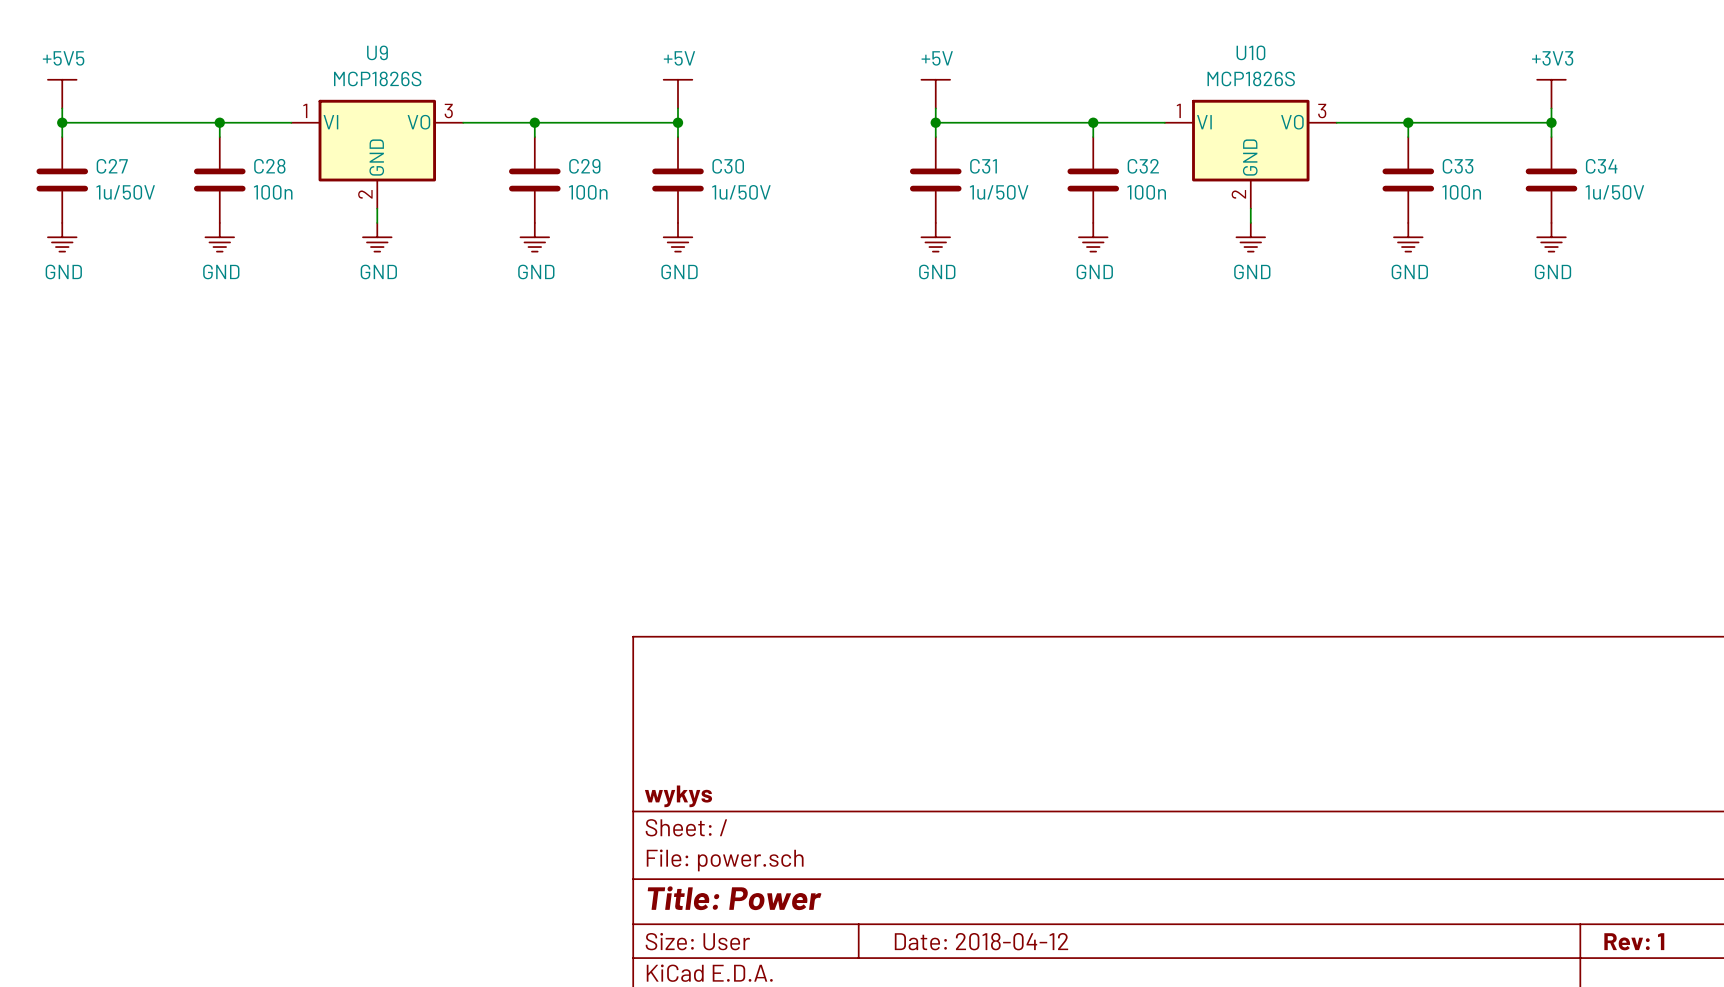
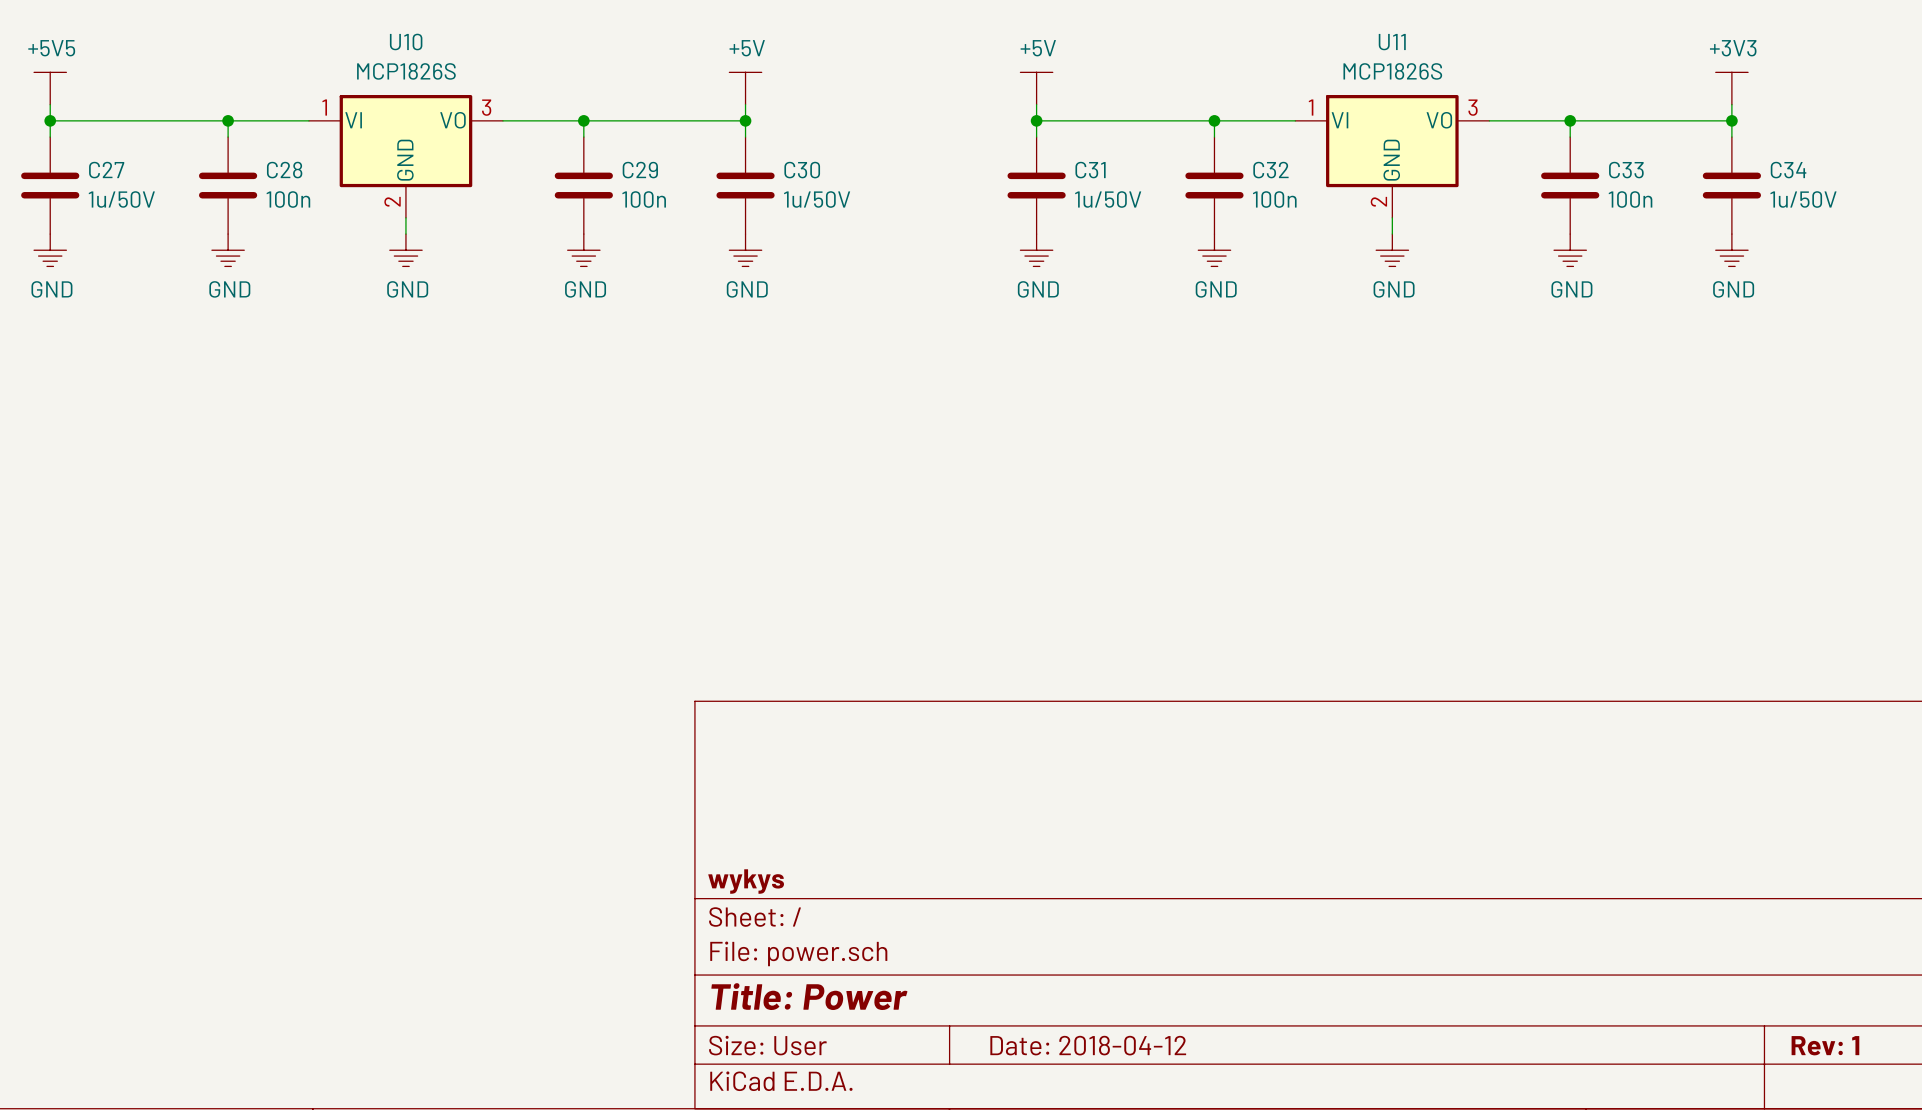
U9 name: U9 (377, 52) -> U10 (406, 42)
U10 name: U10 (1250, 52) -> U11 (1392, 42)

